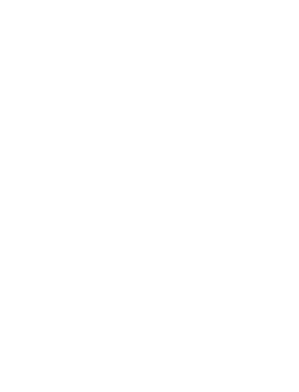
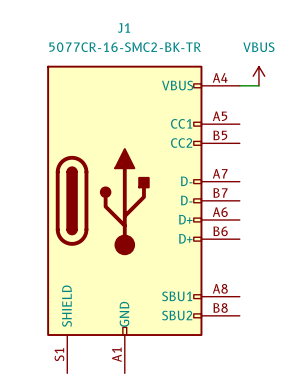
power symbol: none -> VBUS (258, 76)
wire: none -> (239, 85) (258, 85)
J1: none -> 5077CR-16-SMC2-BK-TR (143, 219)

